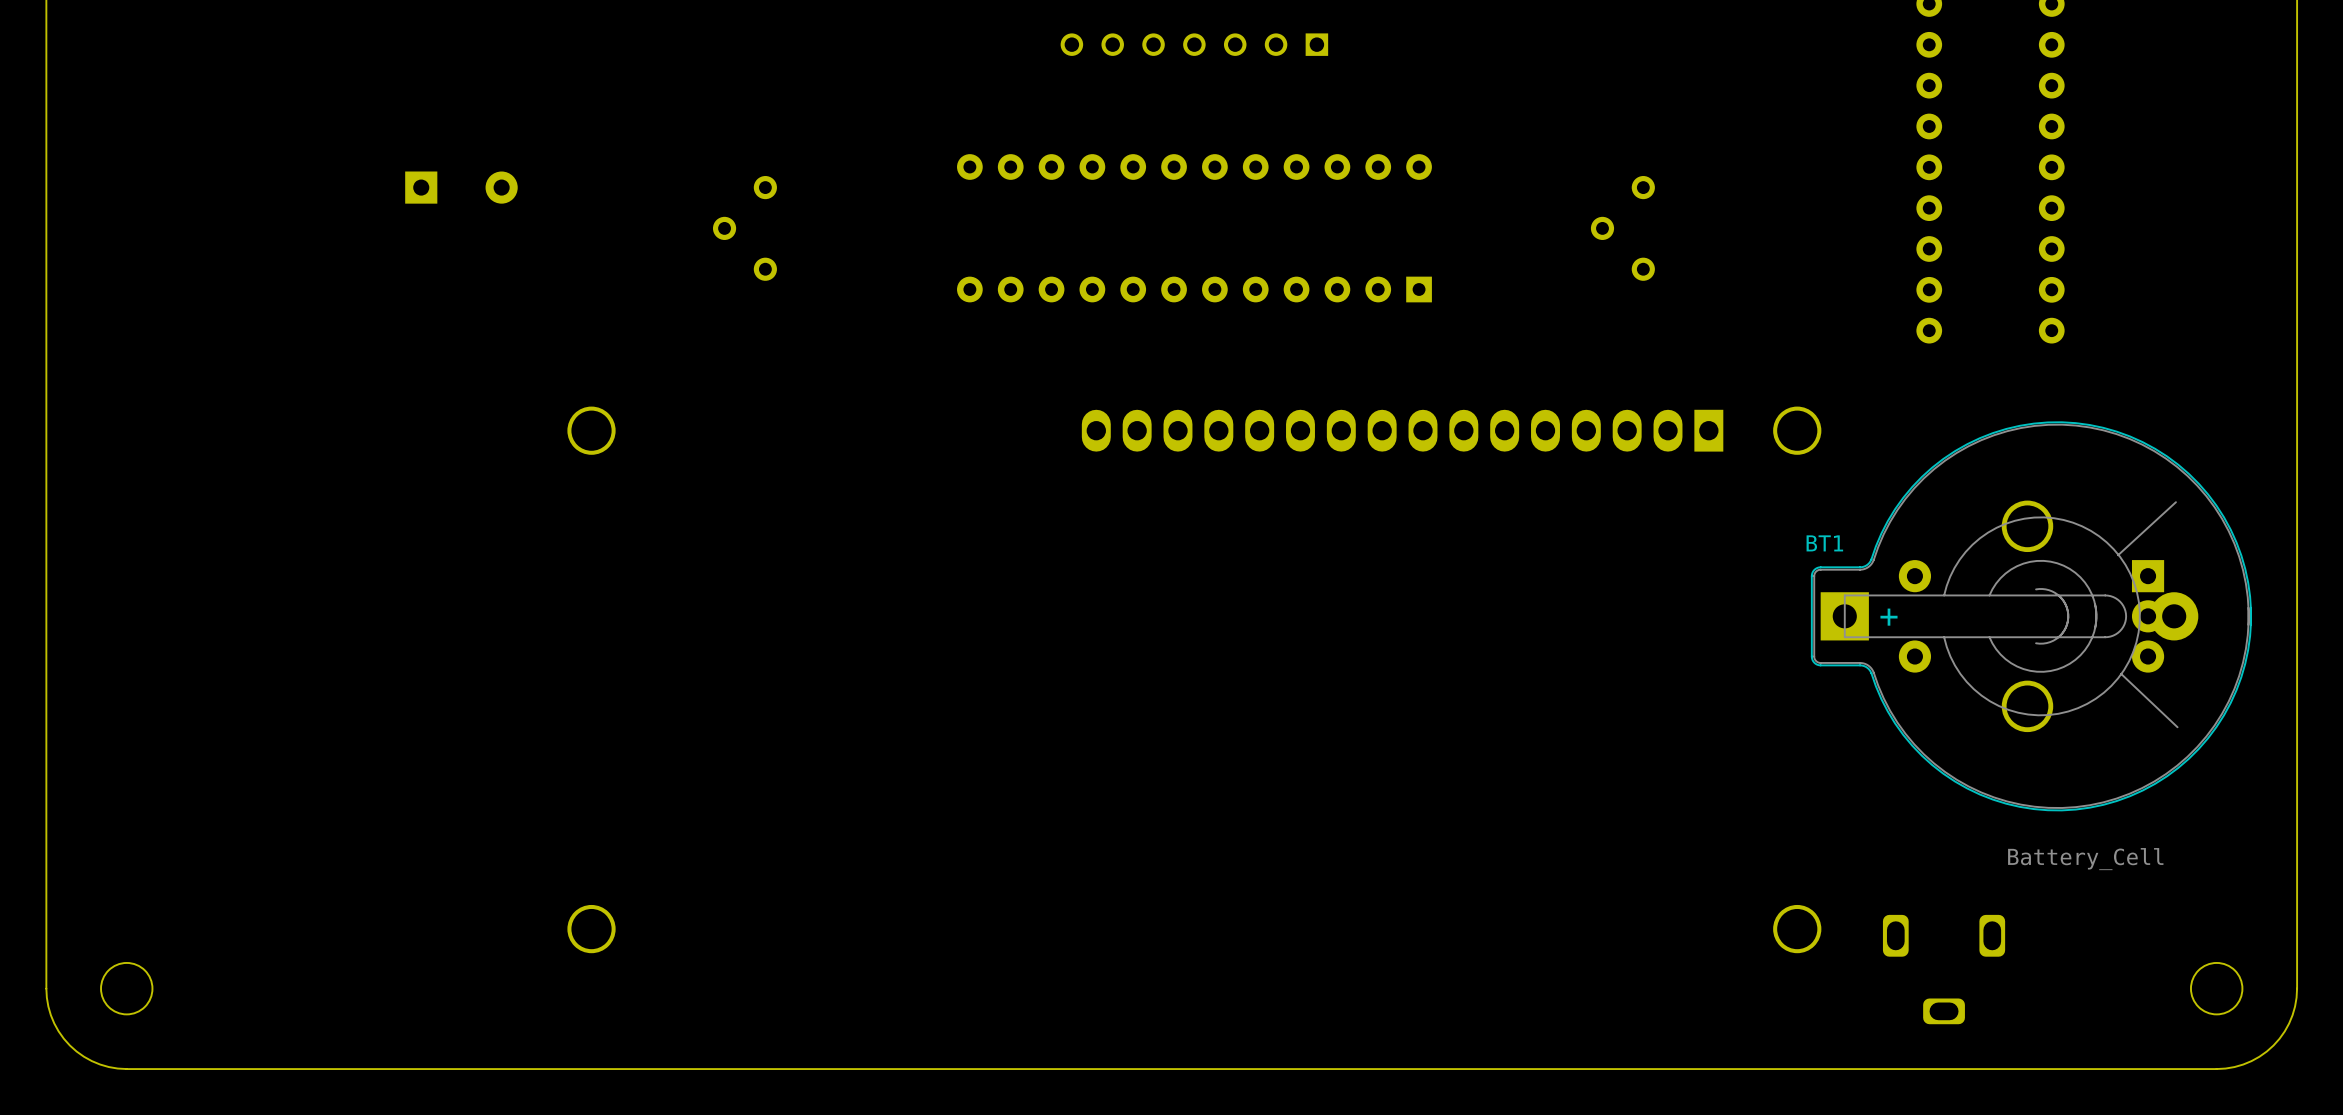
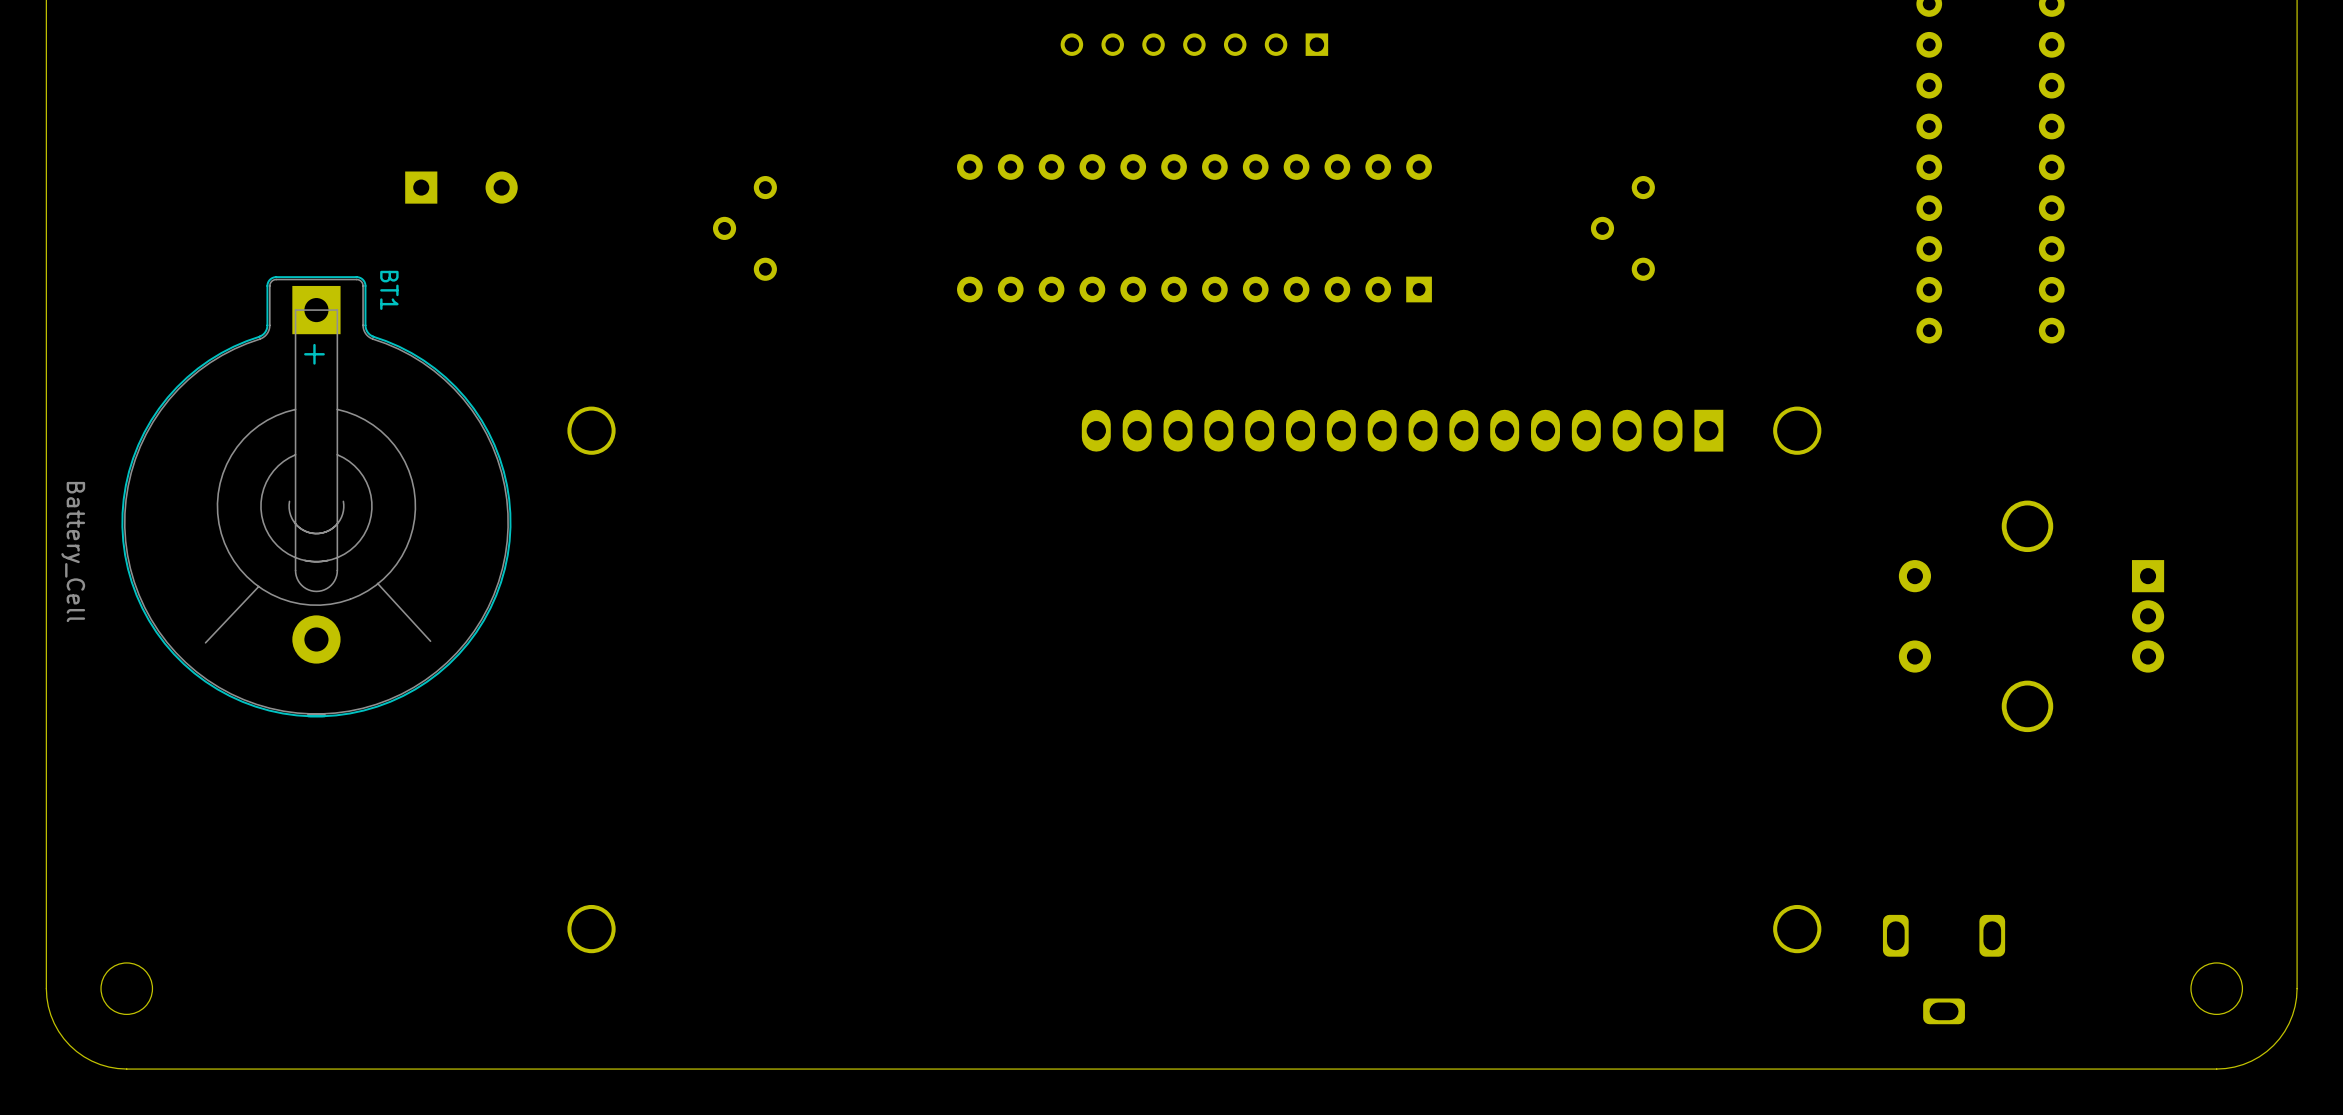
BT1 rotation: 0° (2031, 616) -> 90° clockwise (316, 496)
BT1 position: (2031, 616) -> (316, 496)

